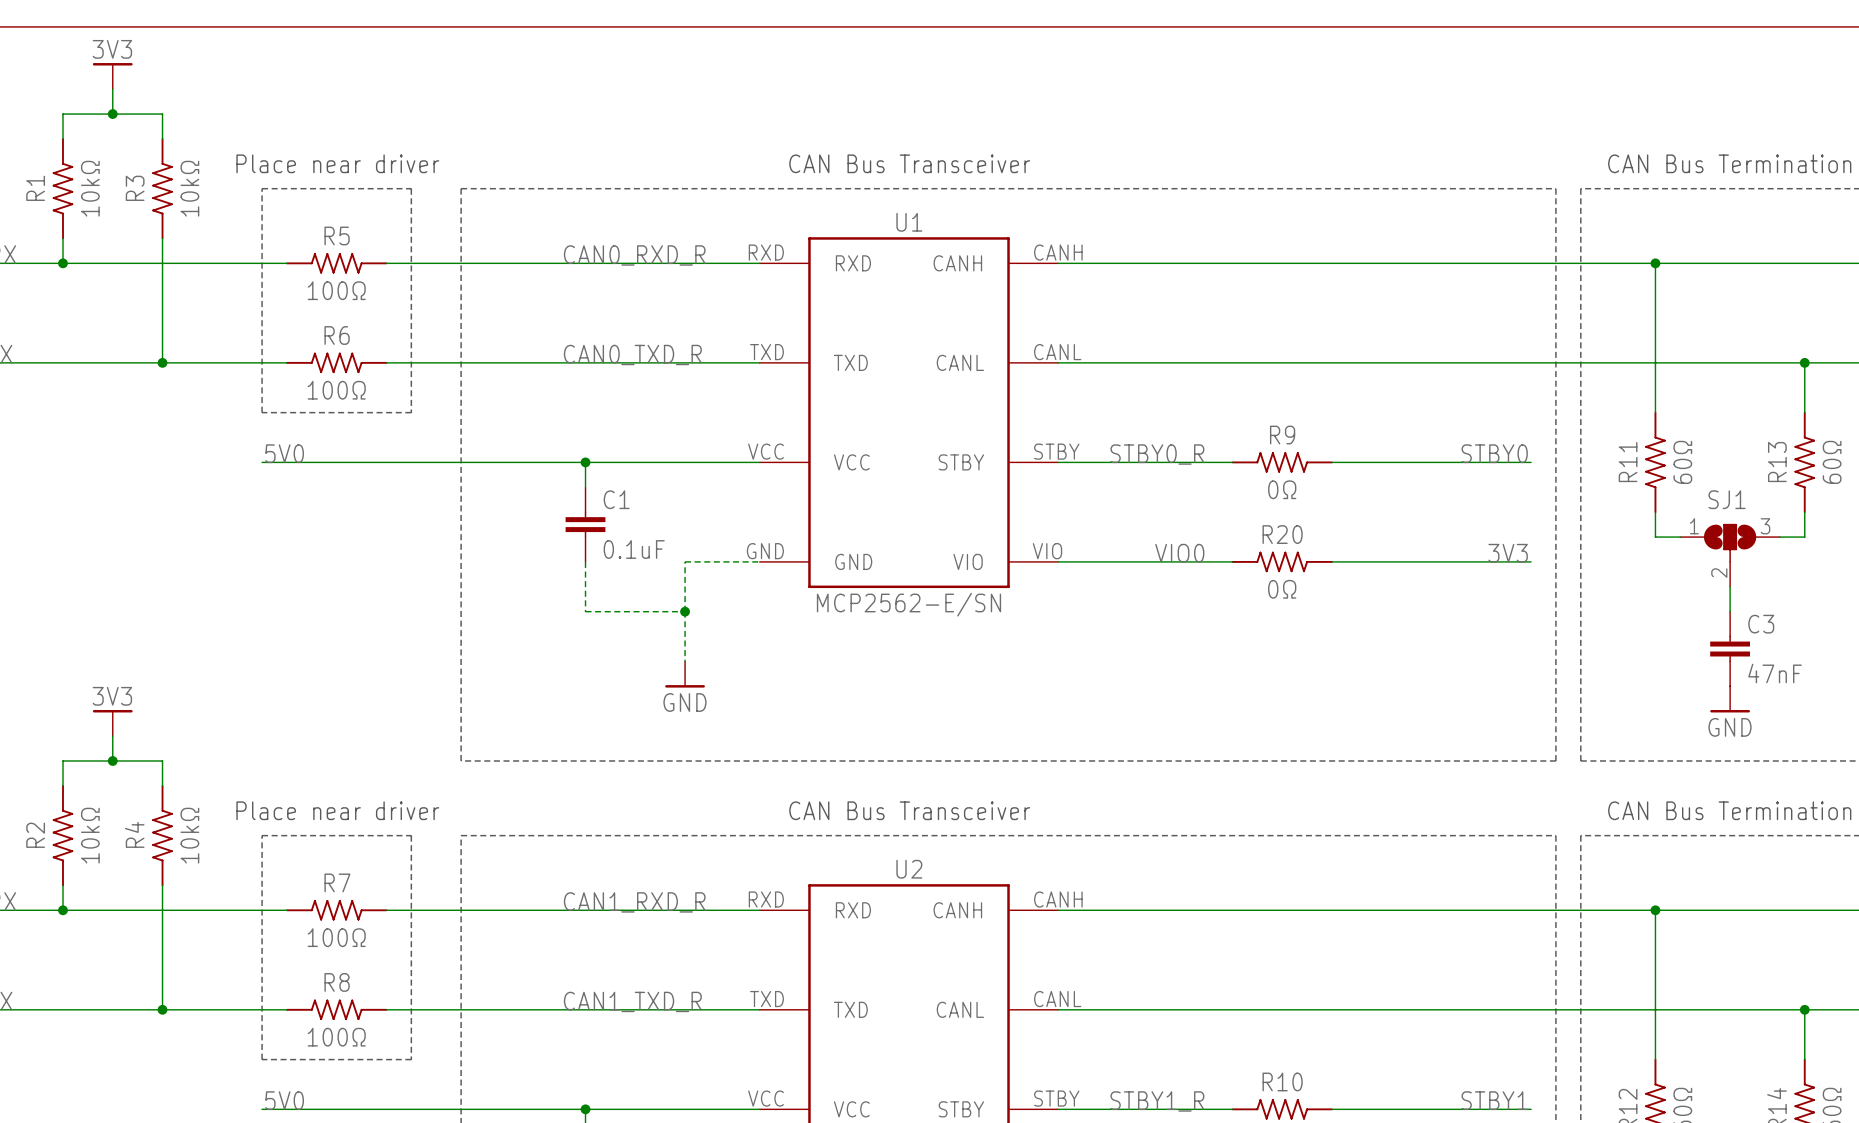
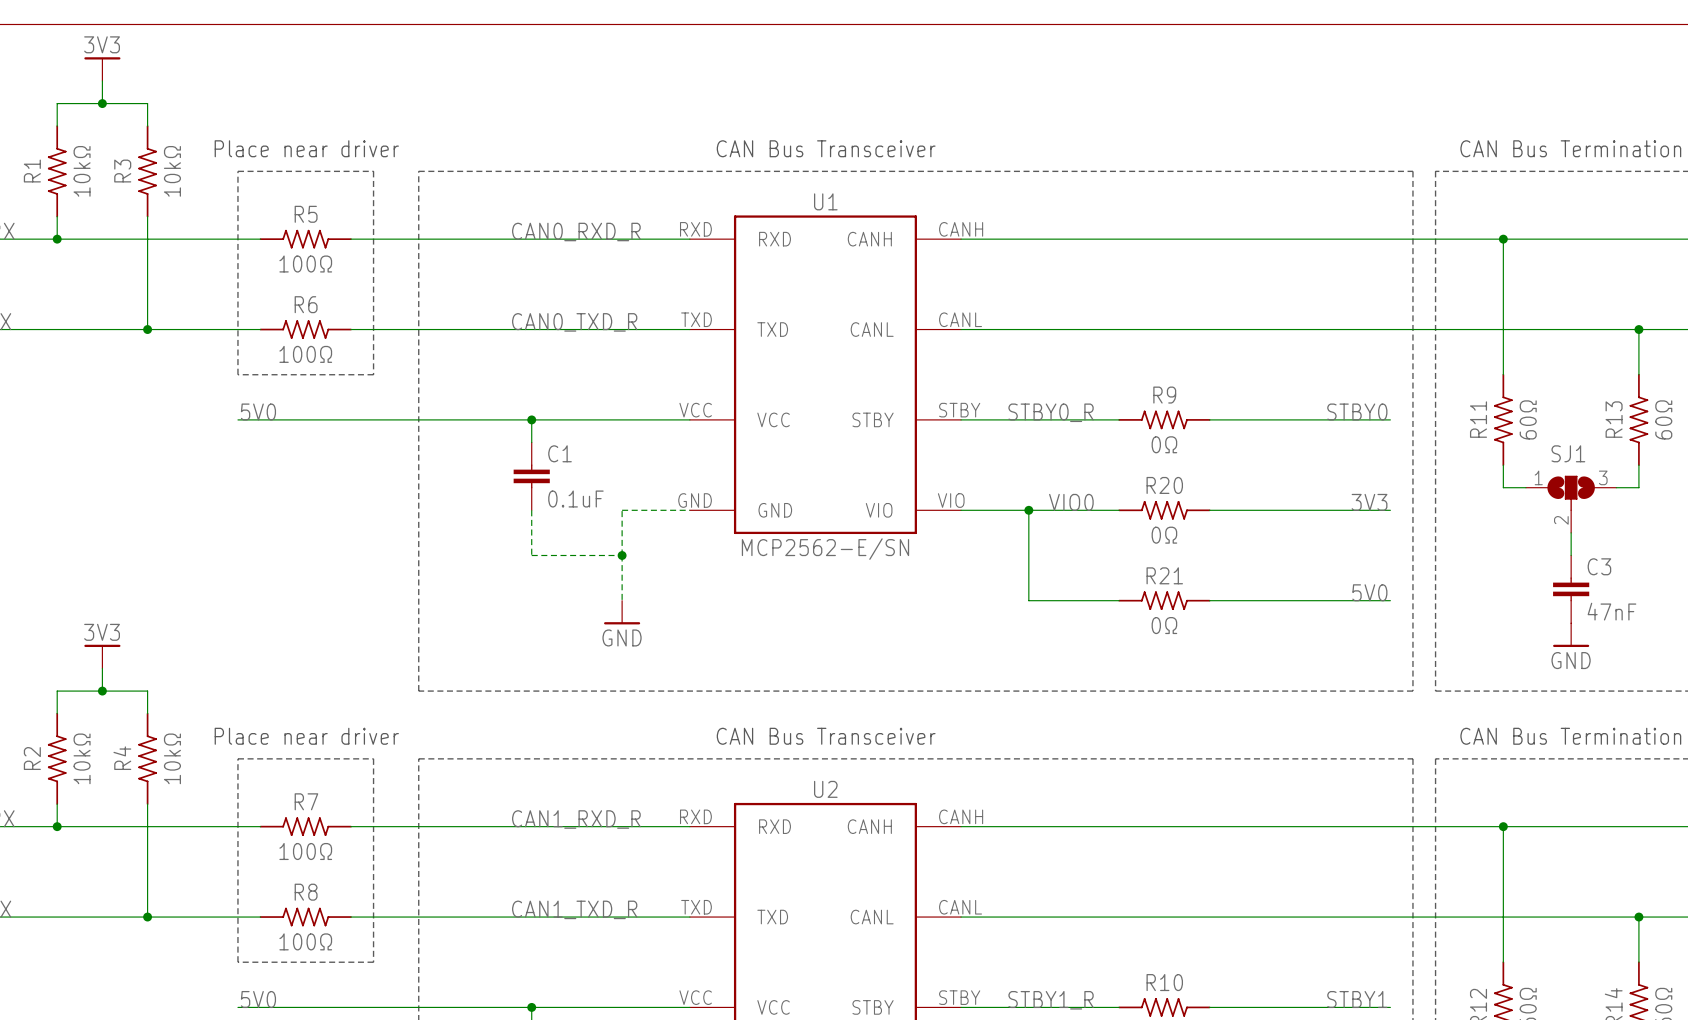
wire: none -> (1028, 510) (1028, 600) (1119, 600)
junction: none -> (1028, 510)
label: none -> 5V0 (1369, 592)
R21: none -> 0Ω (1164, 600)
wire: none -> (1209, 600) (1390, 600)

